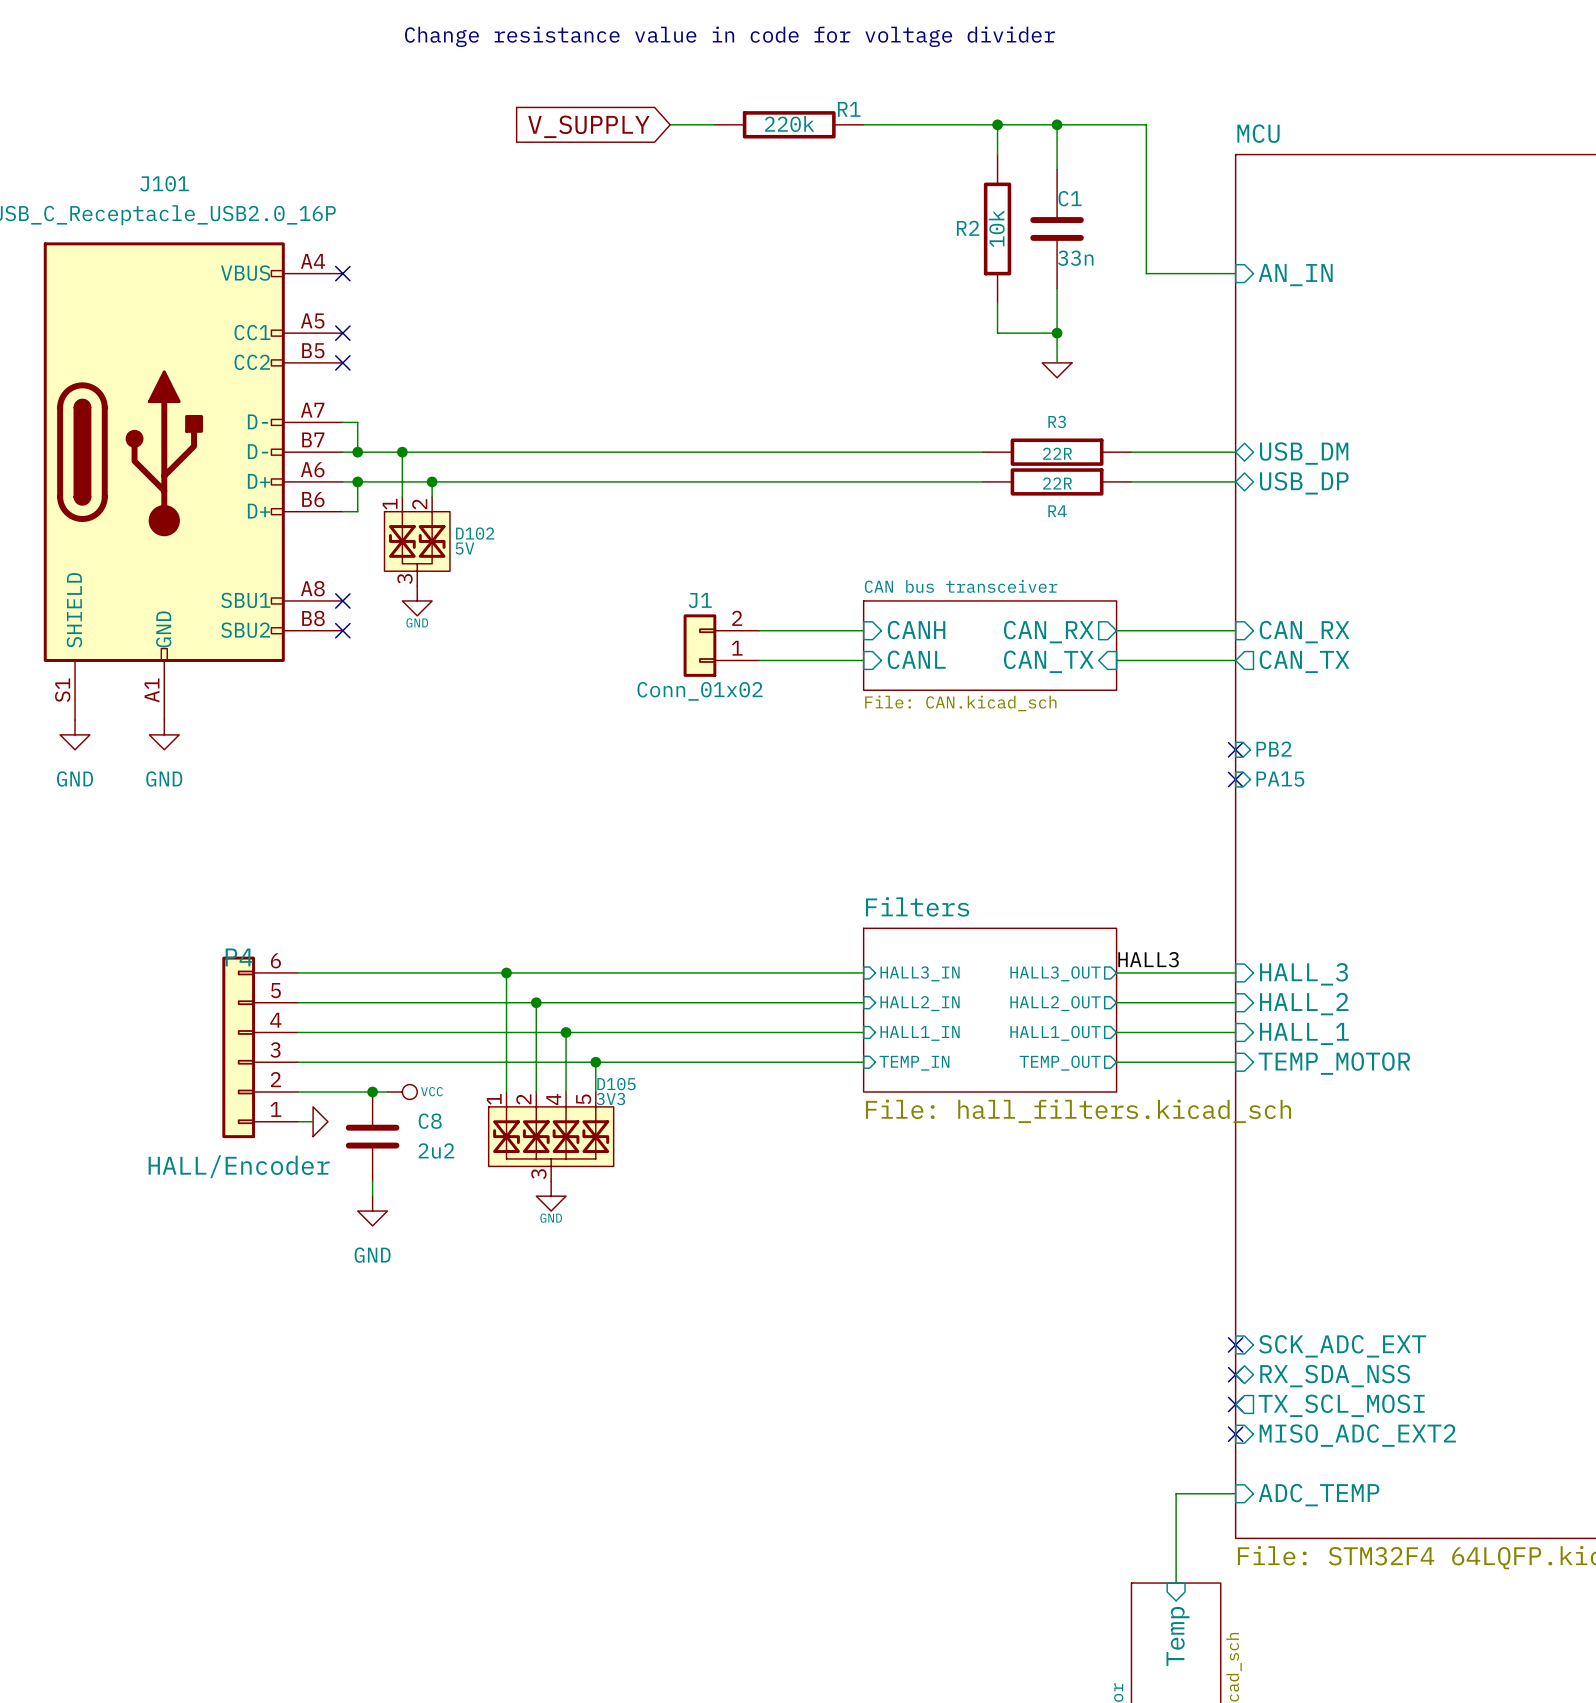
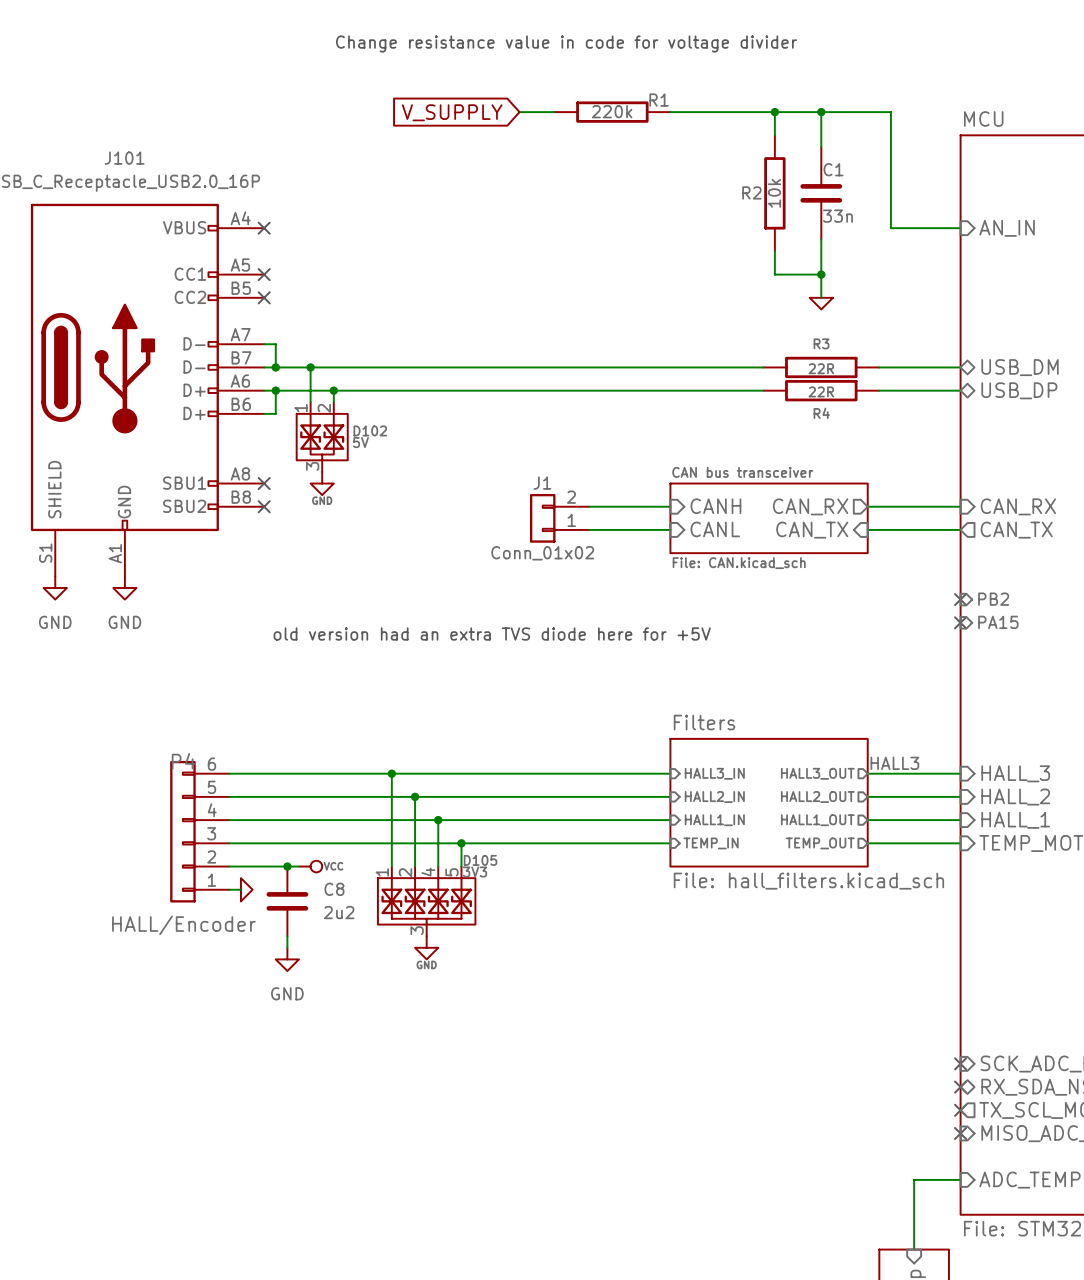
text: none -> old version had an extra TVS diode here for +5V (492, 634)

